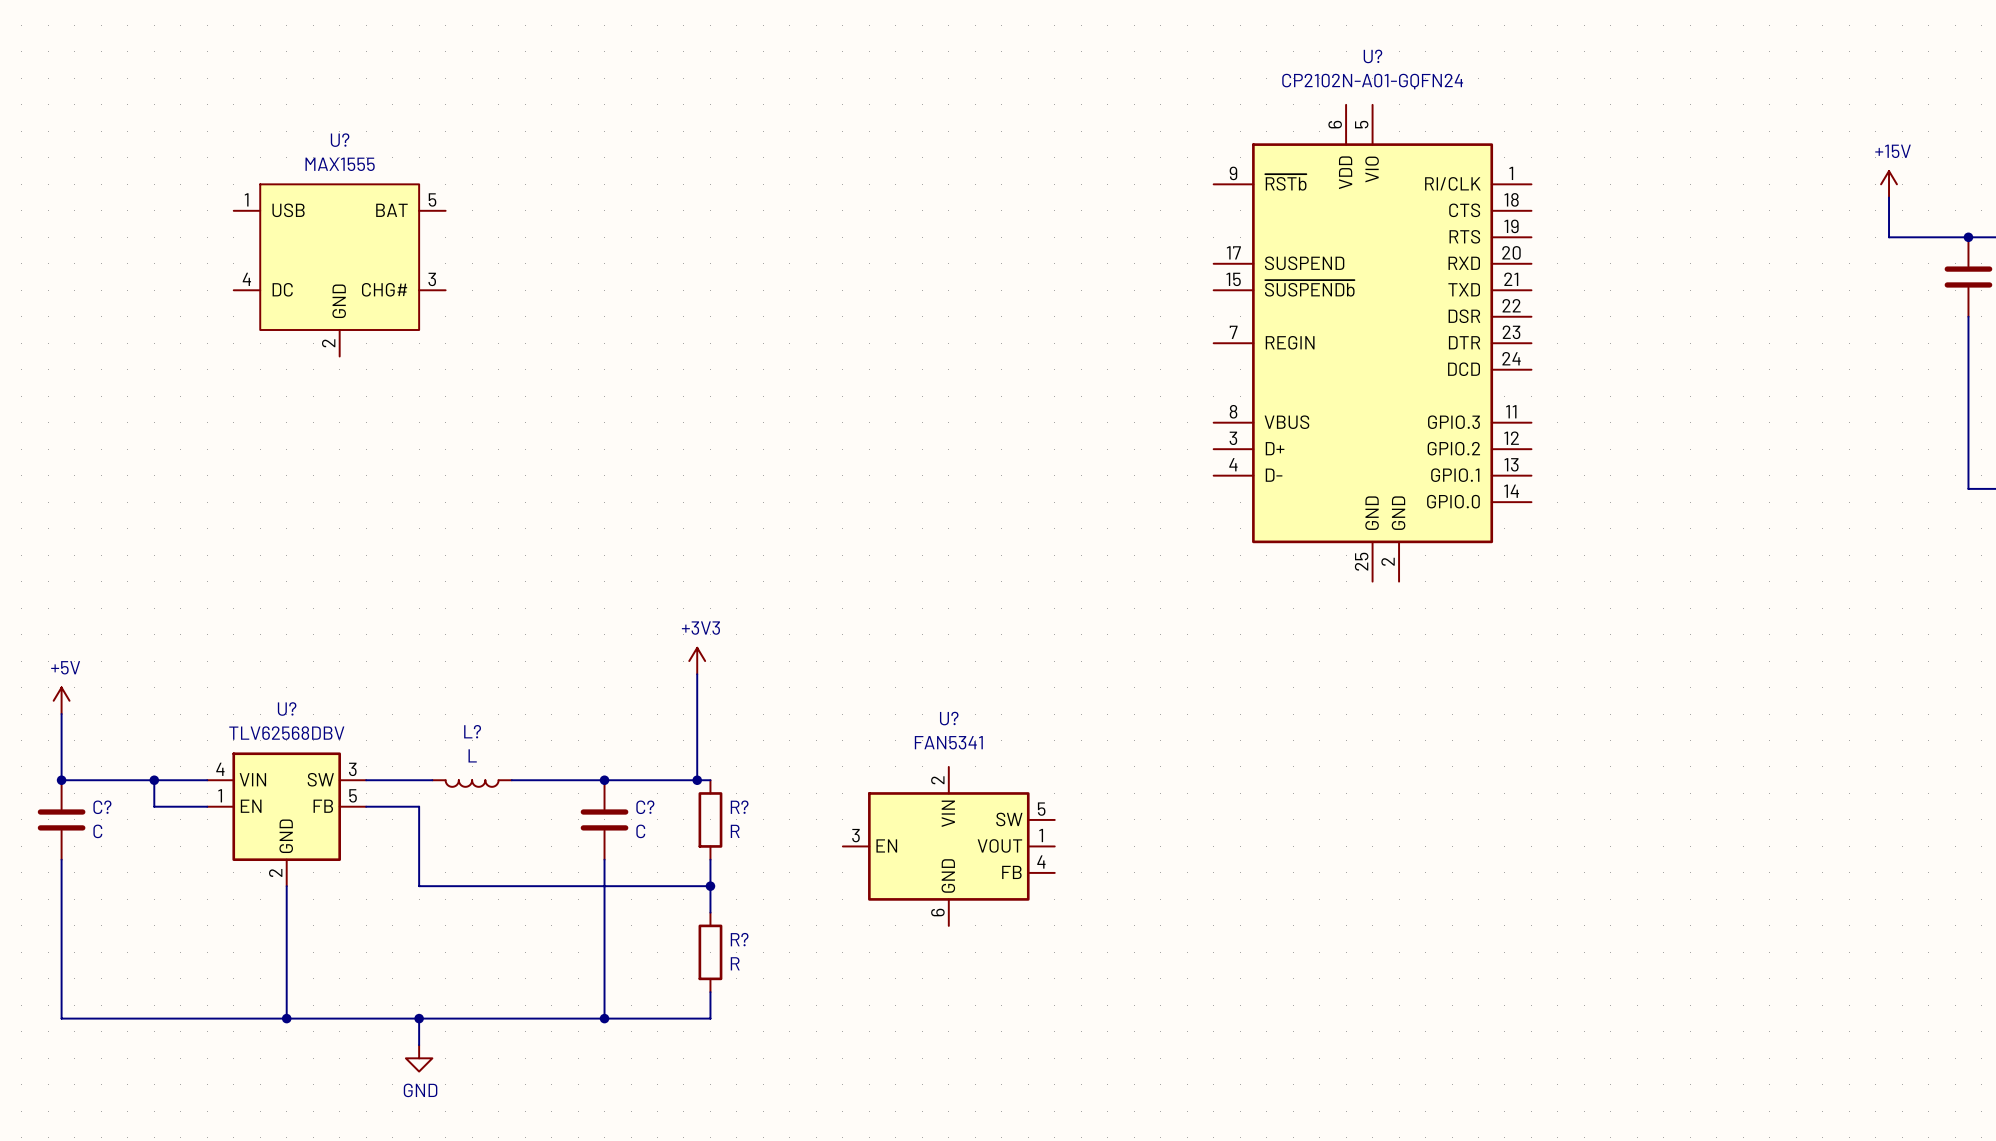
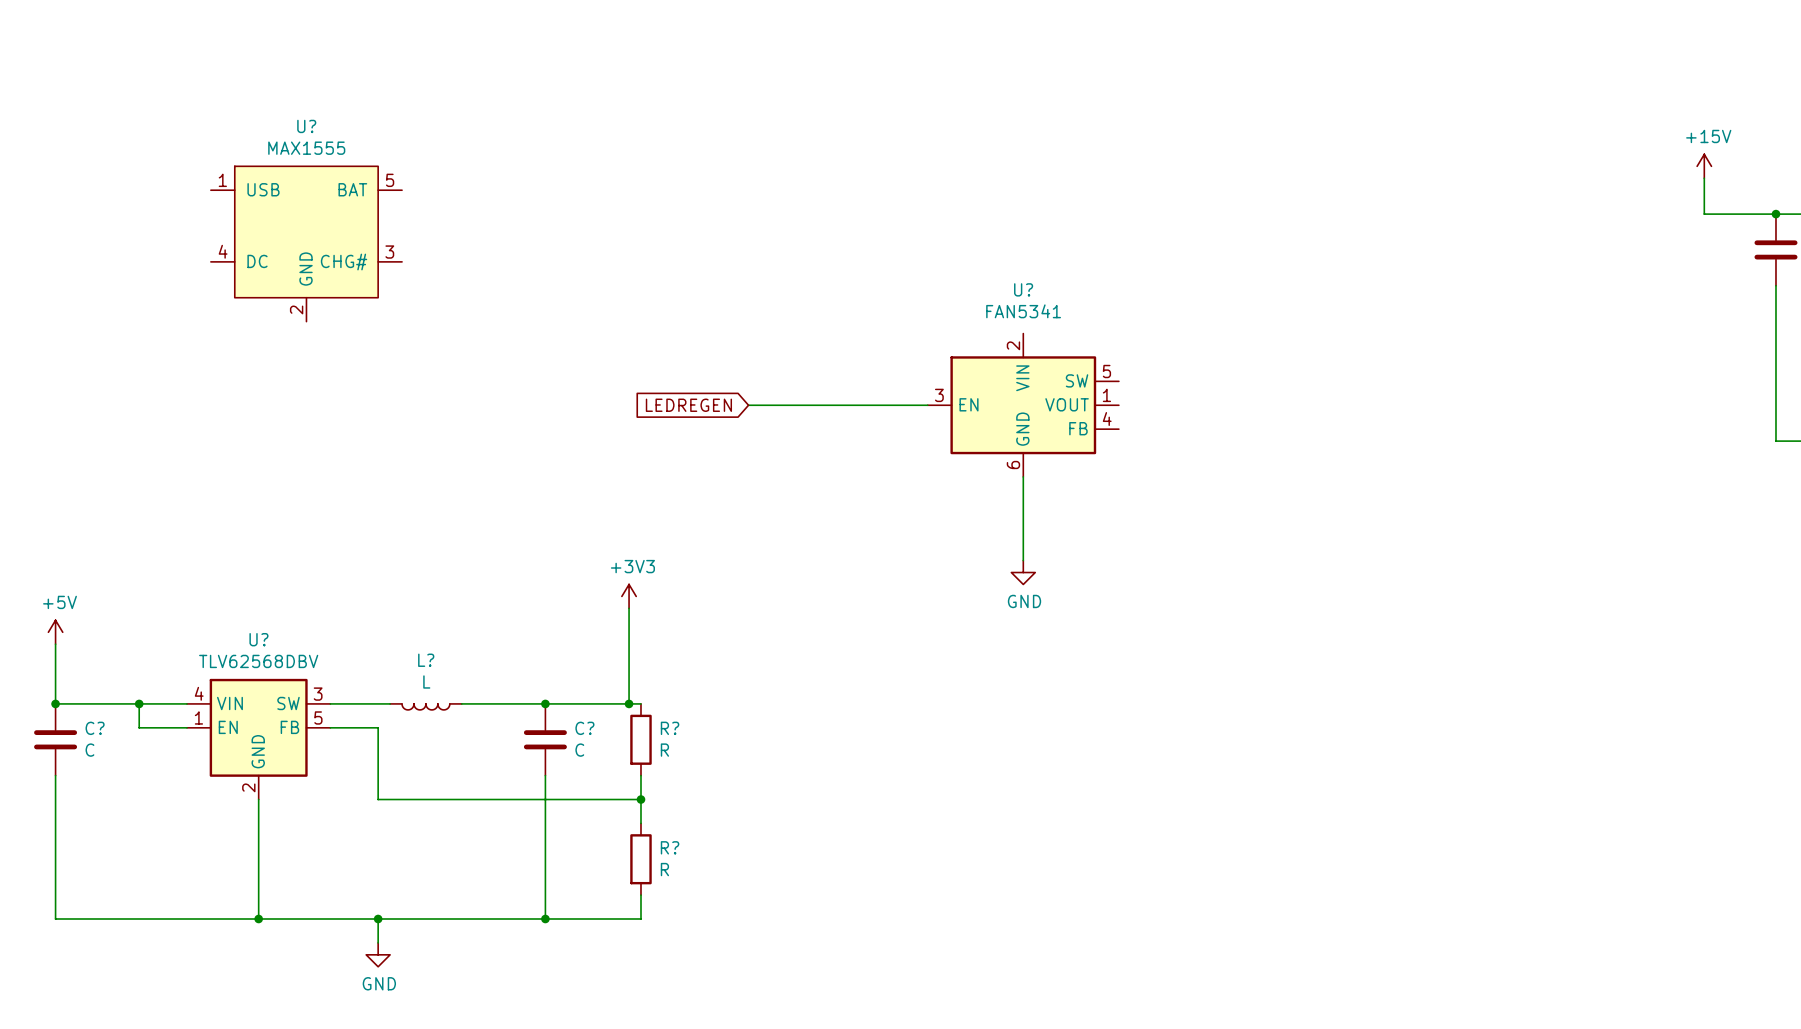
U?: CP2102N-A01-GQFN24 (1372, 343) -> none
global label: none -> LEDREGEN (688, 405)
wire: none -> (748, 405) (927, 405)
U?: none -> FAN5341 (1023, 405)
wire: none -> (1023, 476) (1023, 560)
power symbol: none -> GND (1023, 572)
U?: FAN5341 (948, 846) -> none

